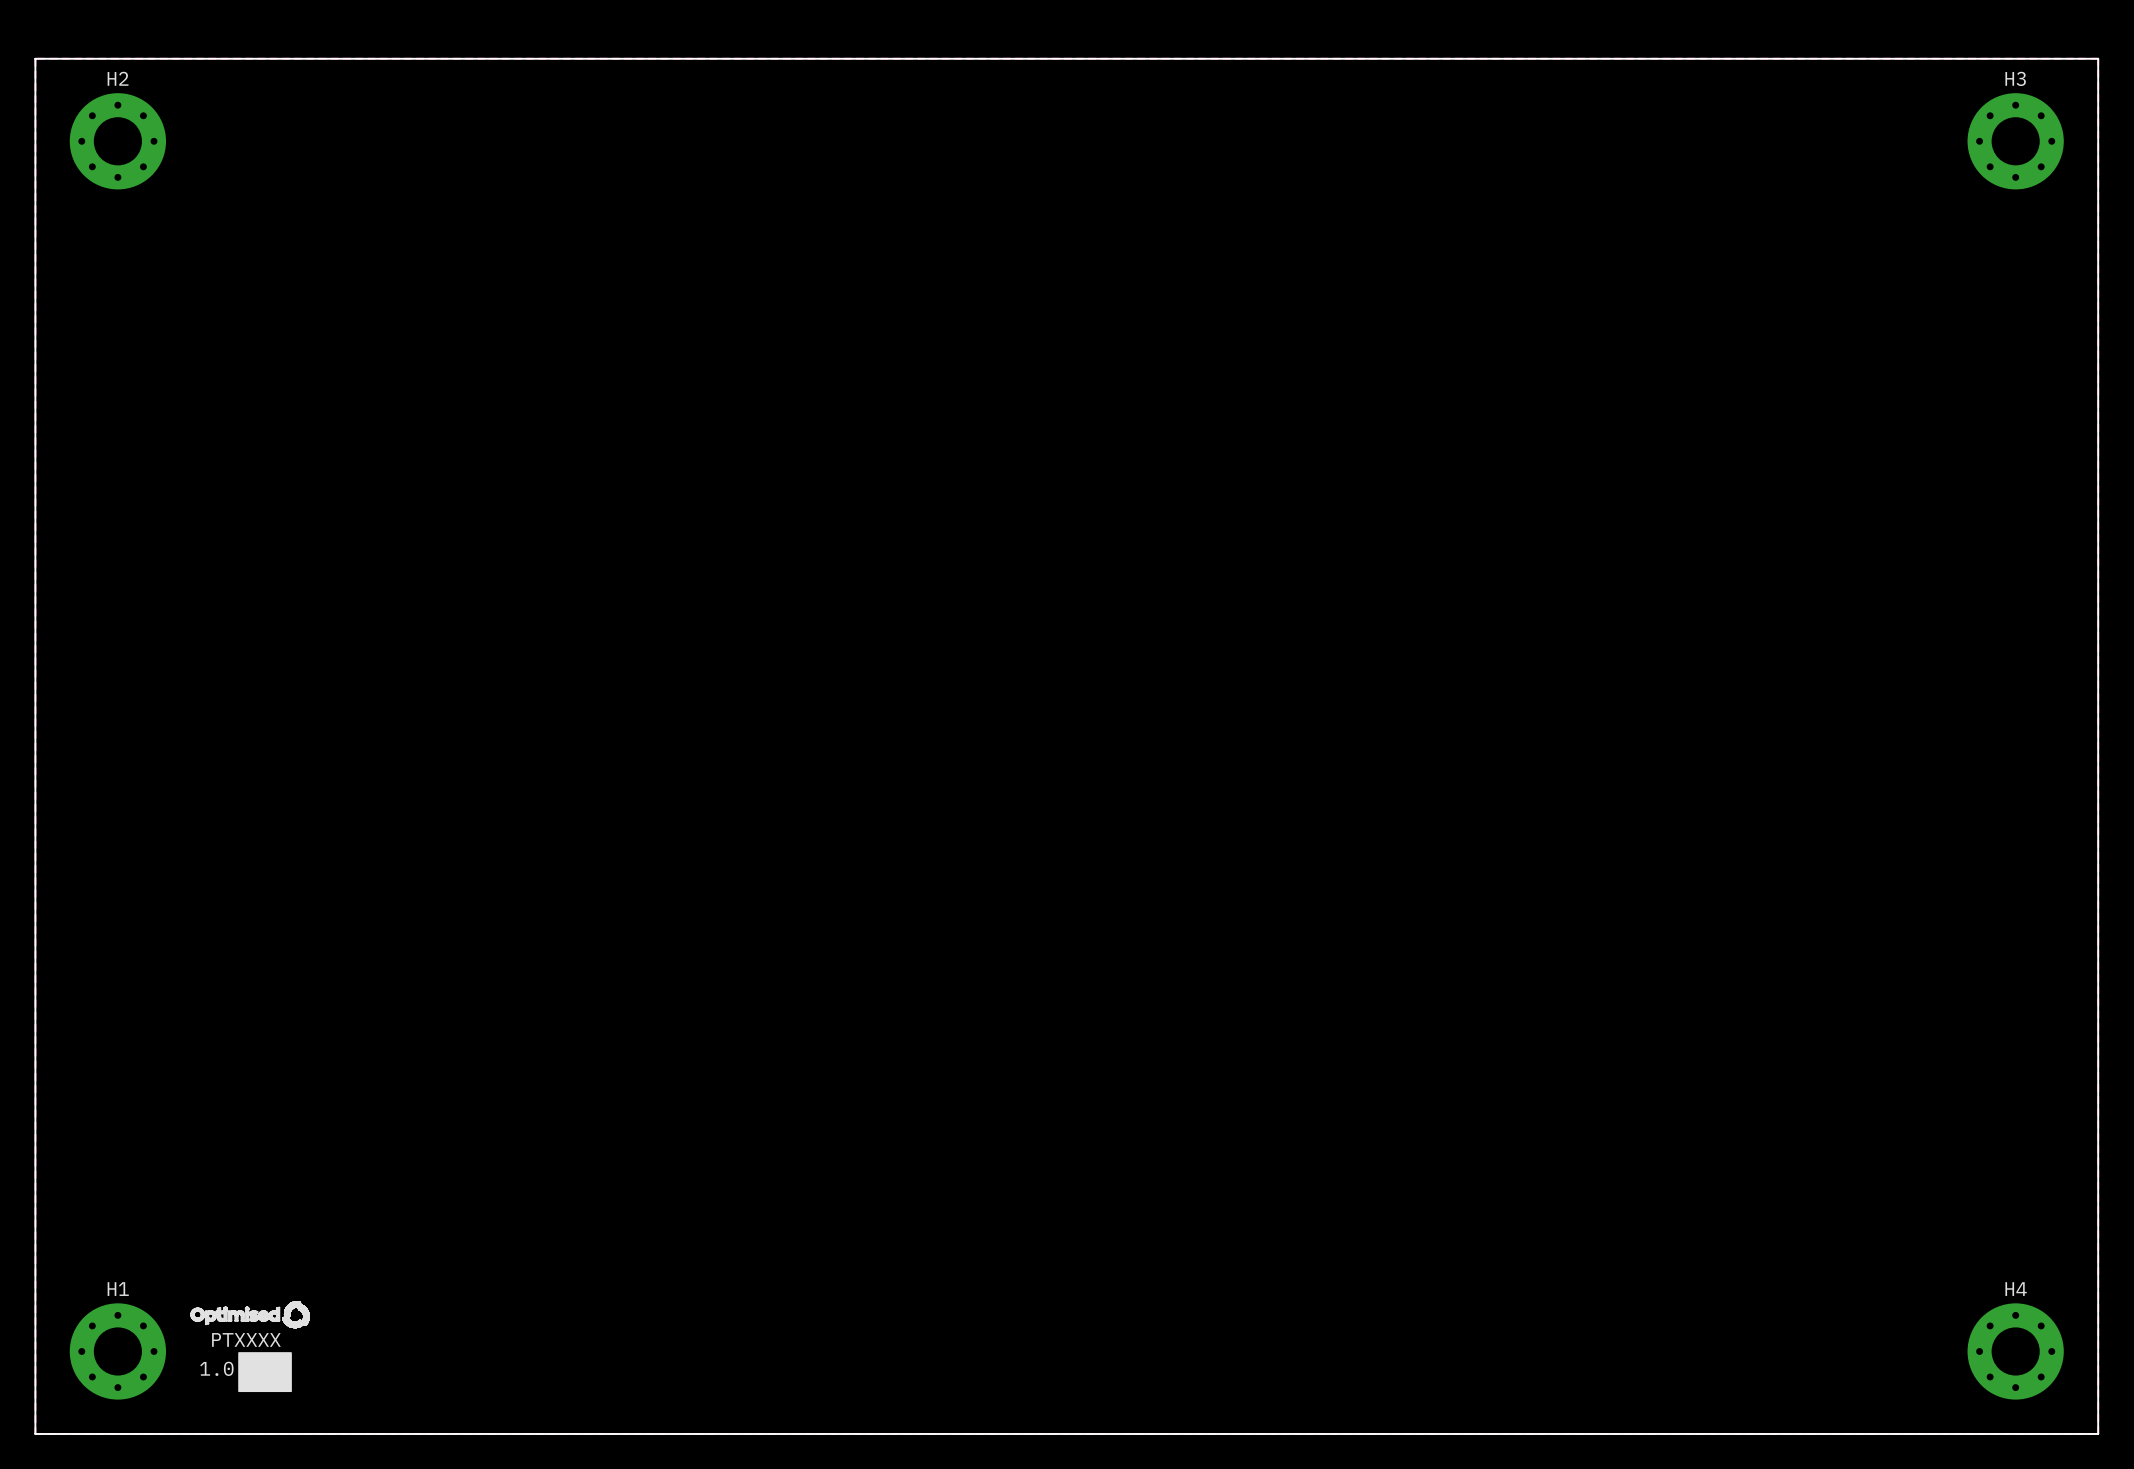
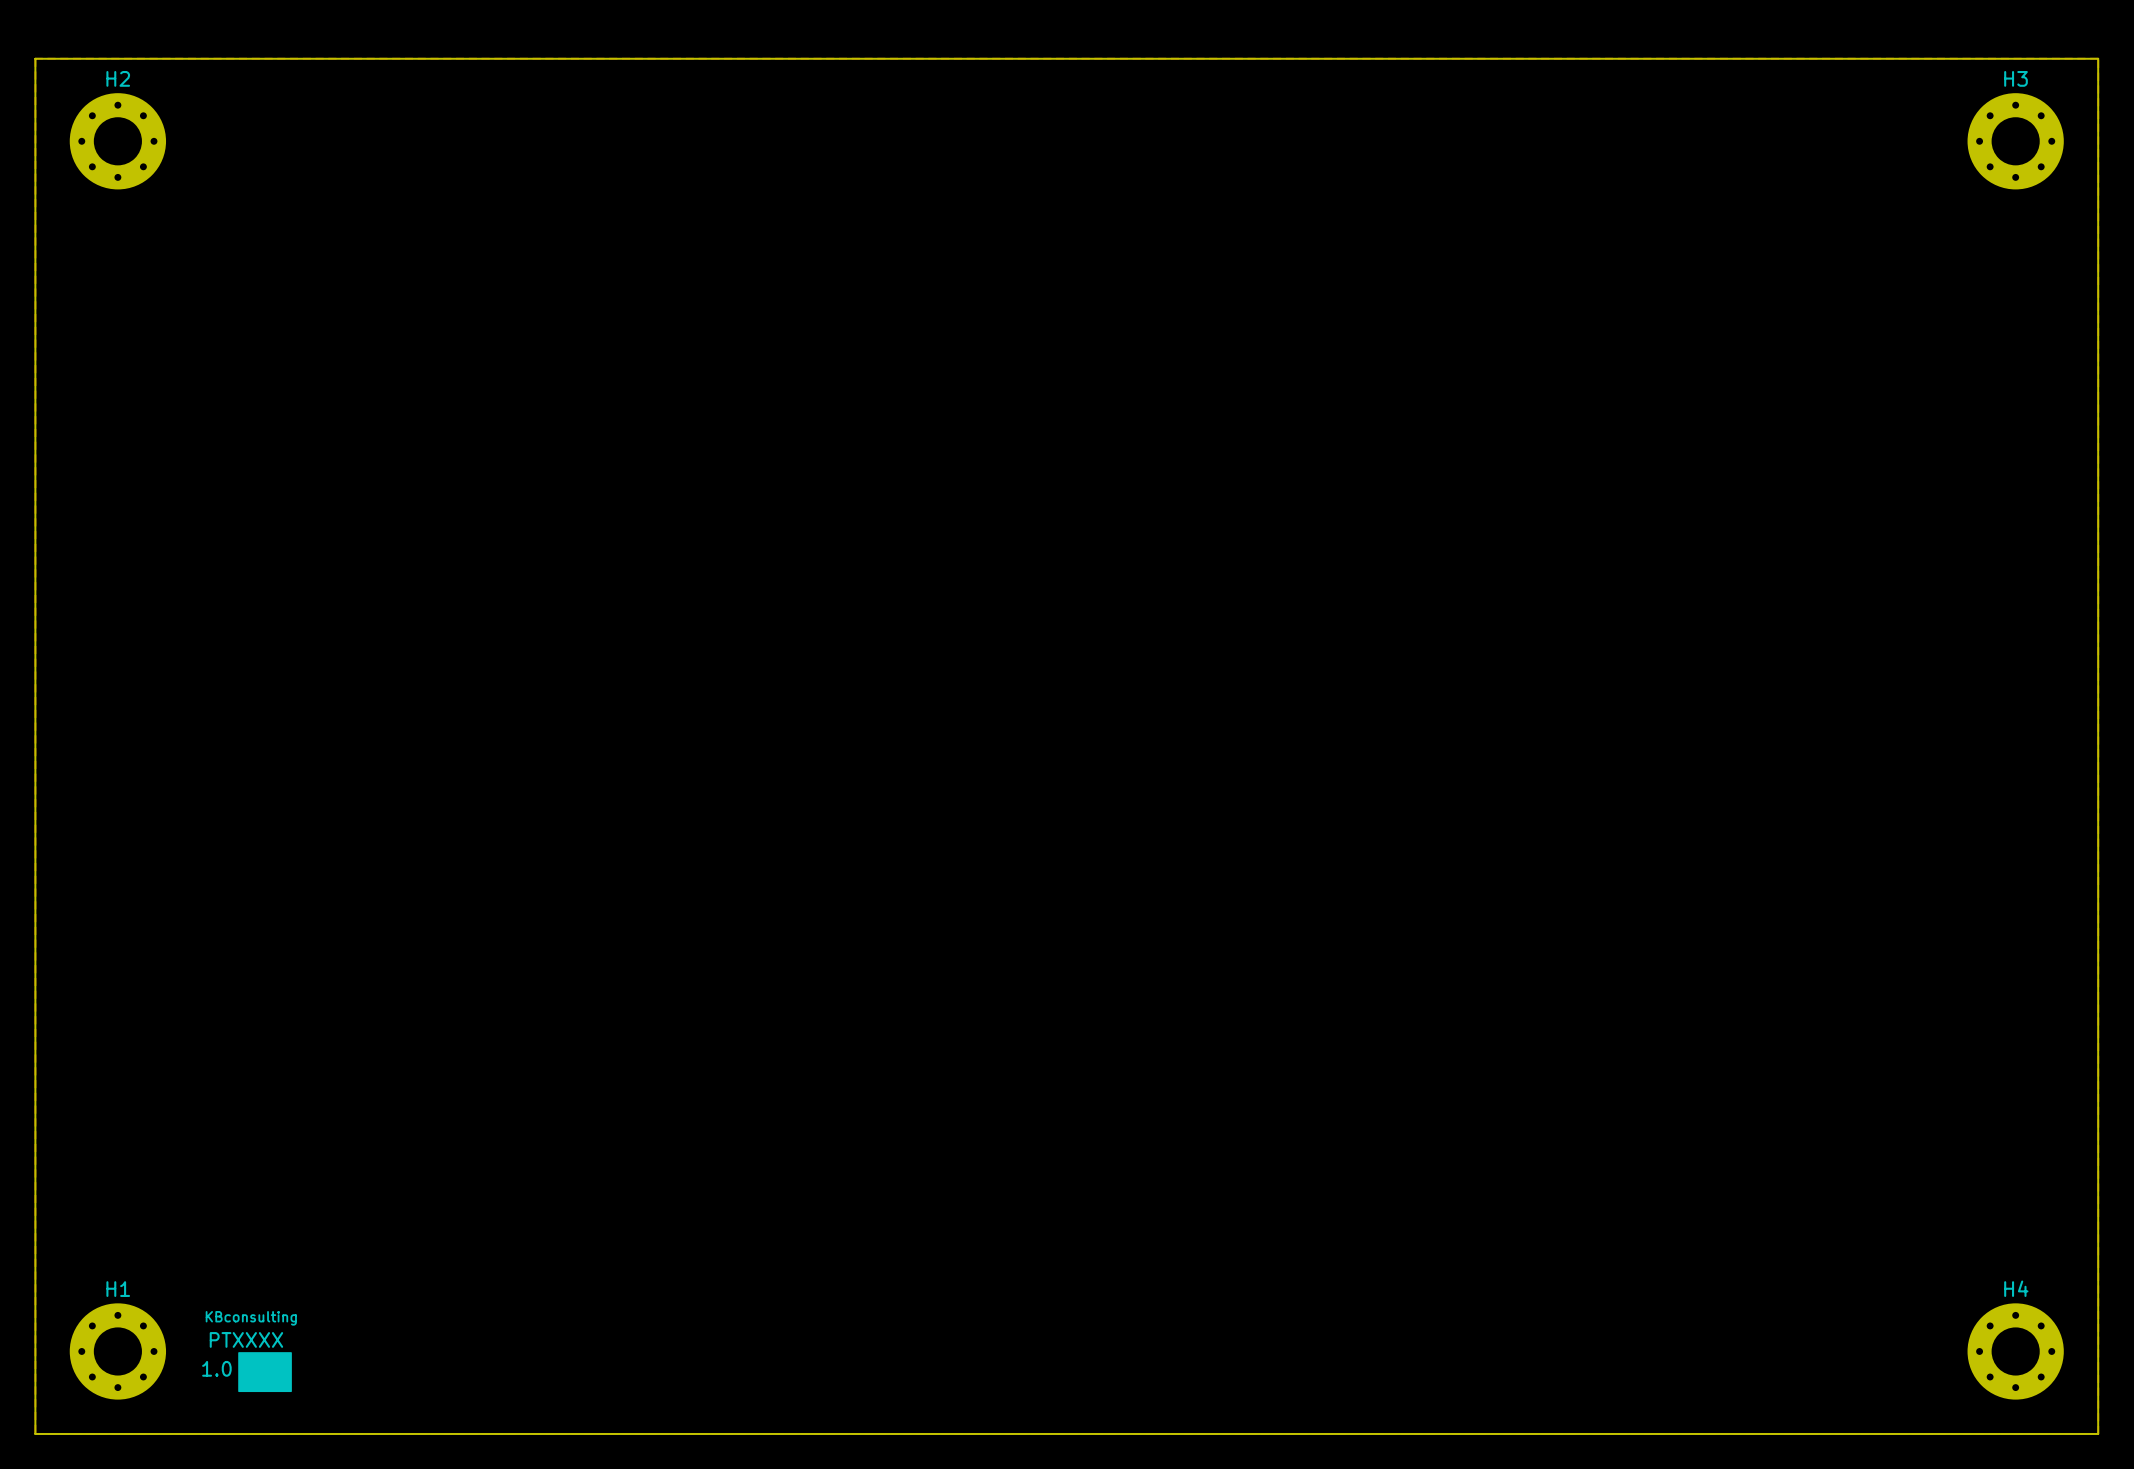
drawing: [191, 1302, 309, 1328] -> none
text: none -> KBconsulting (251, 1318)

